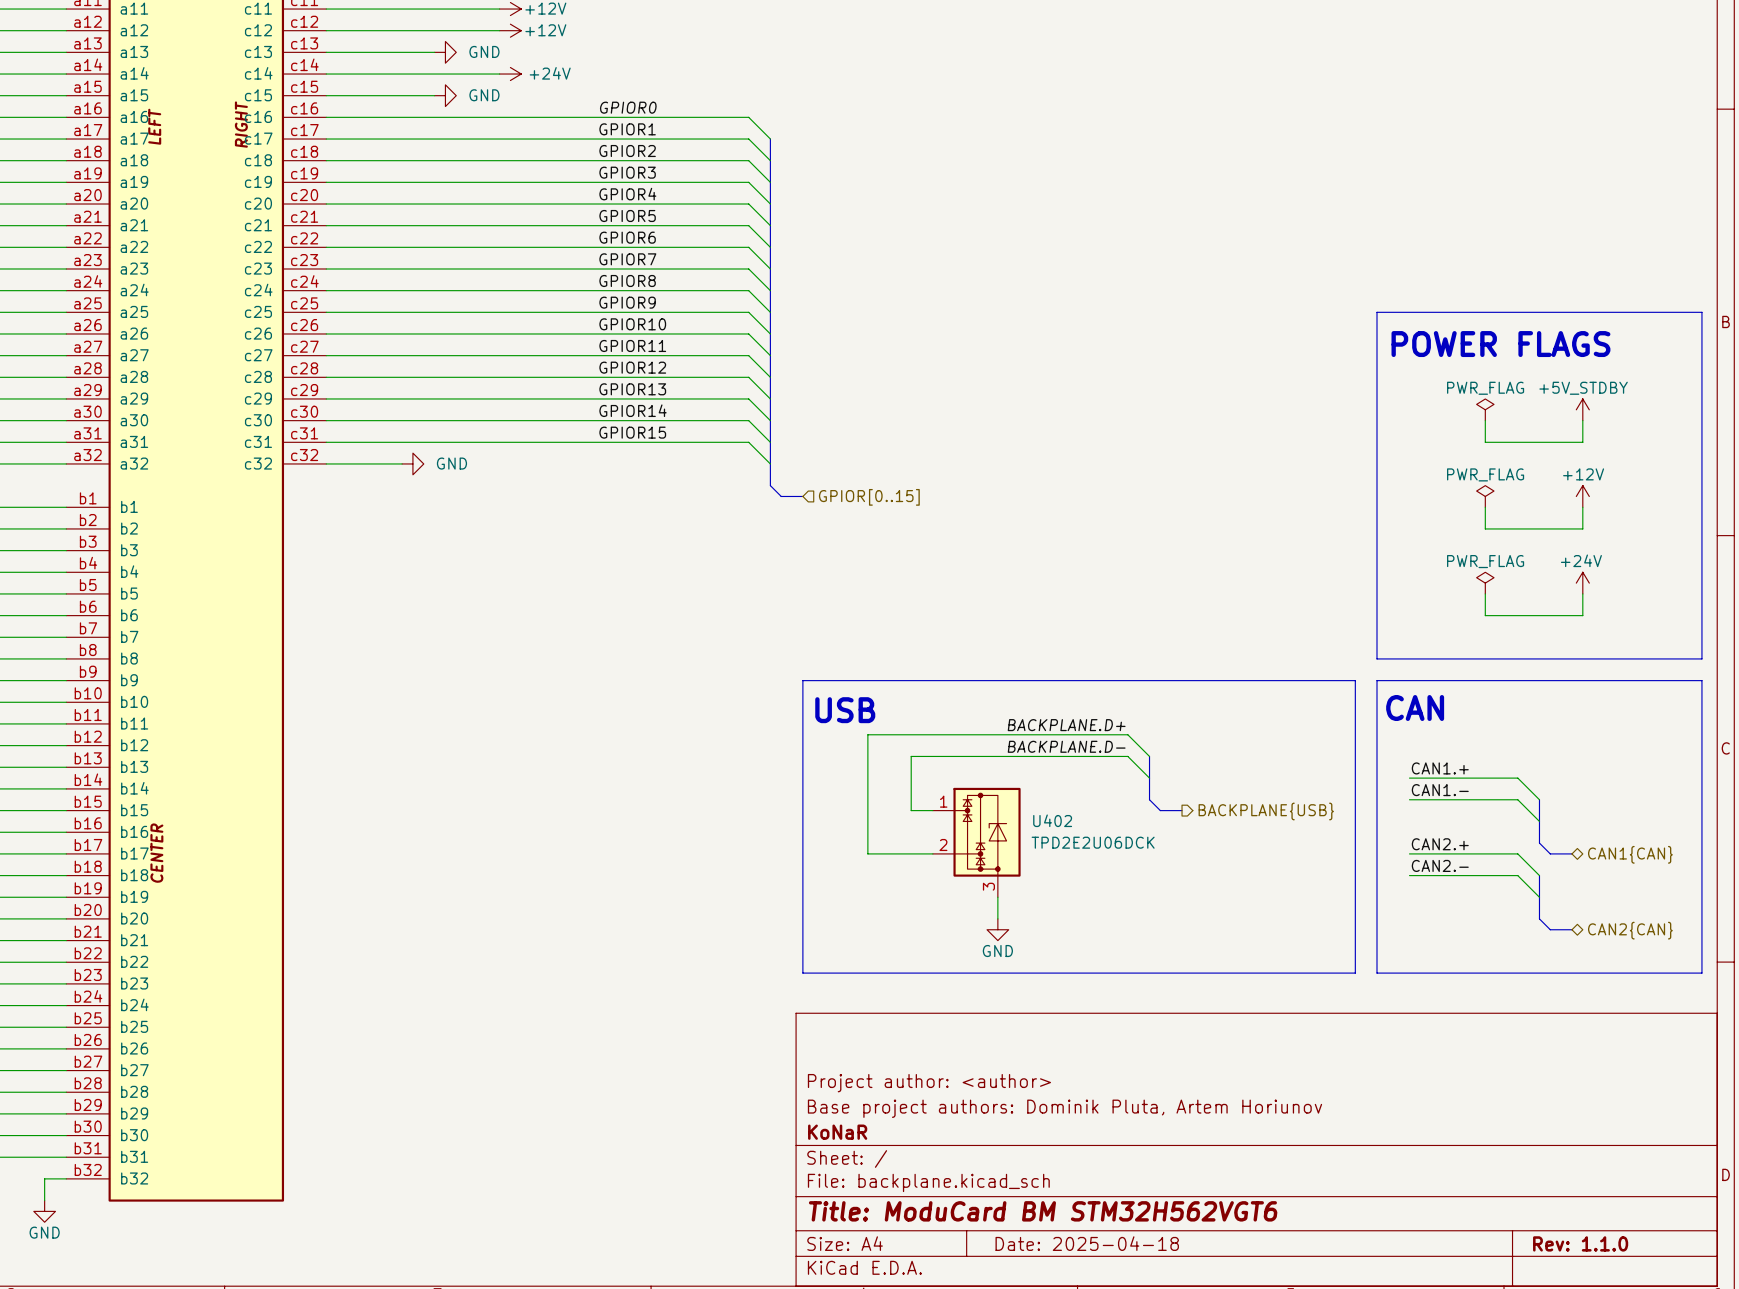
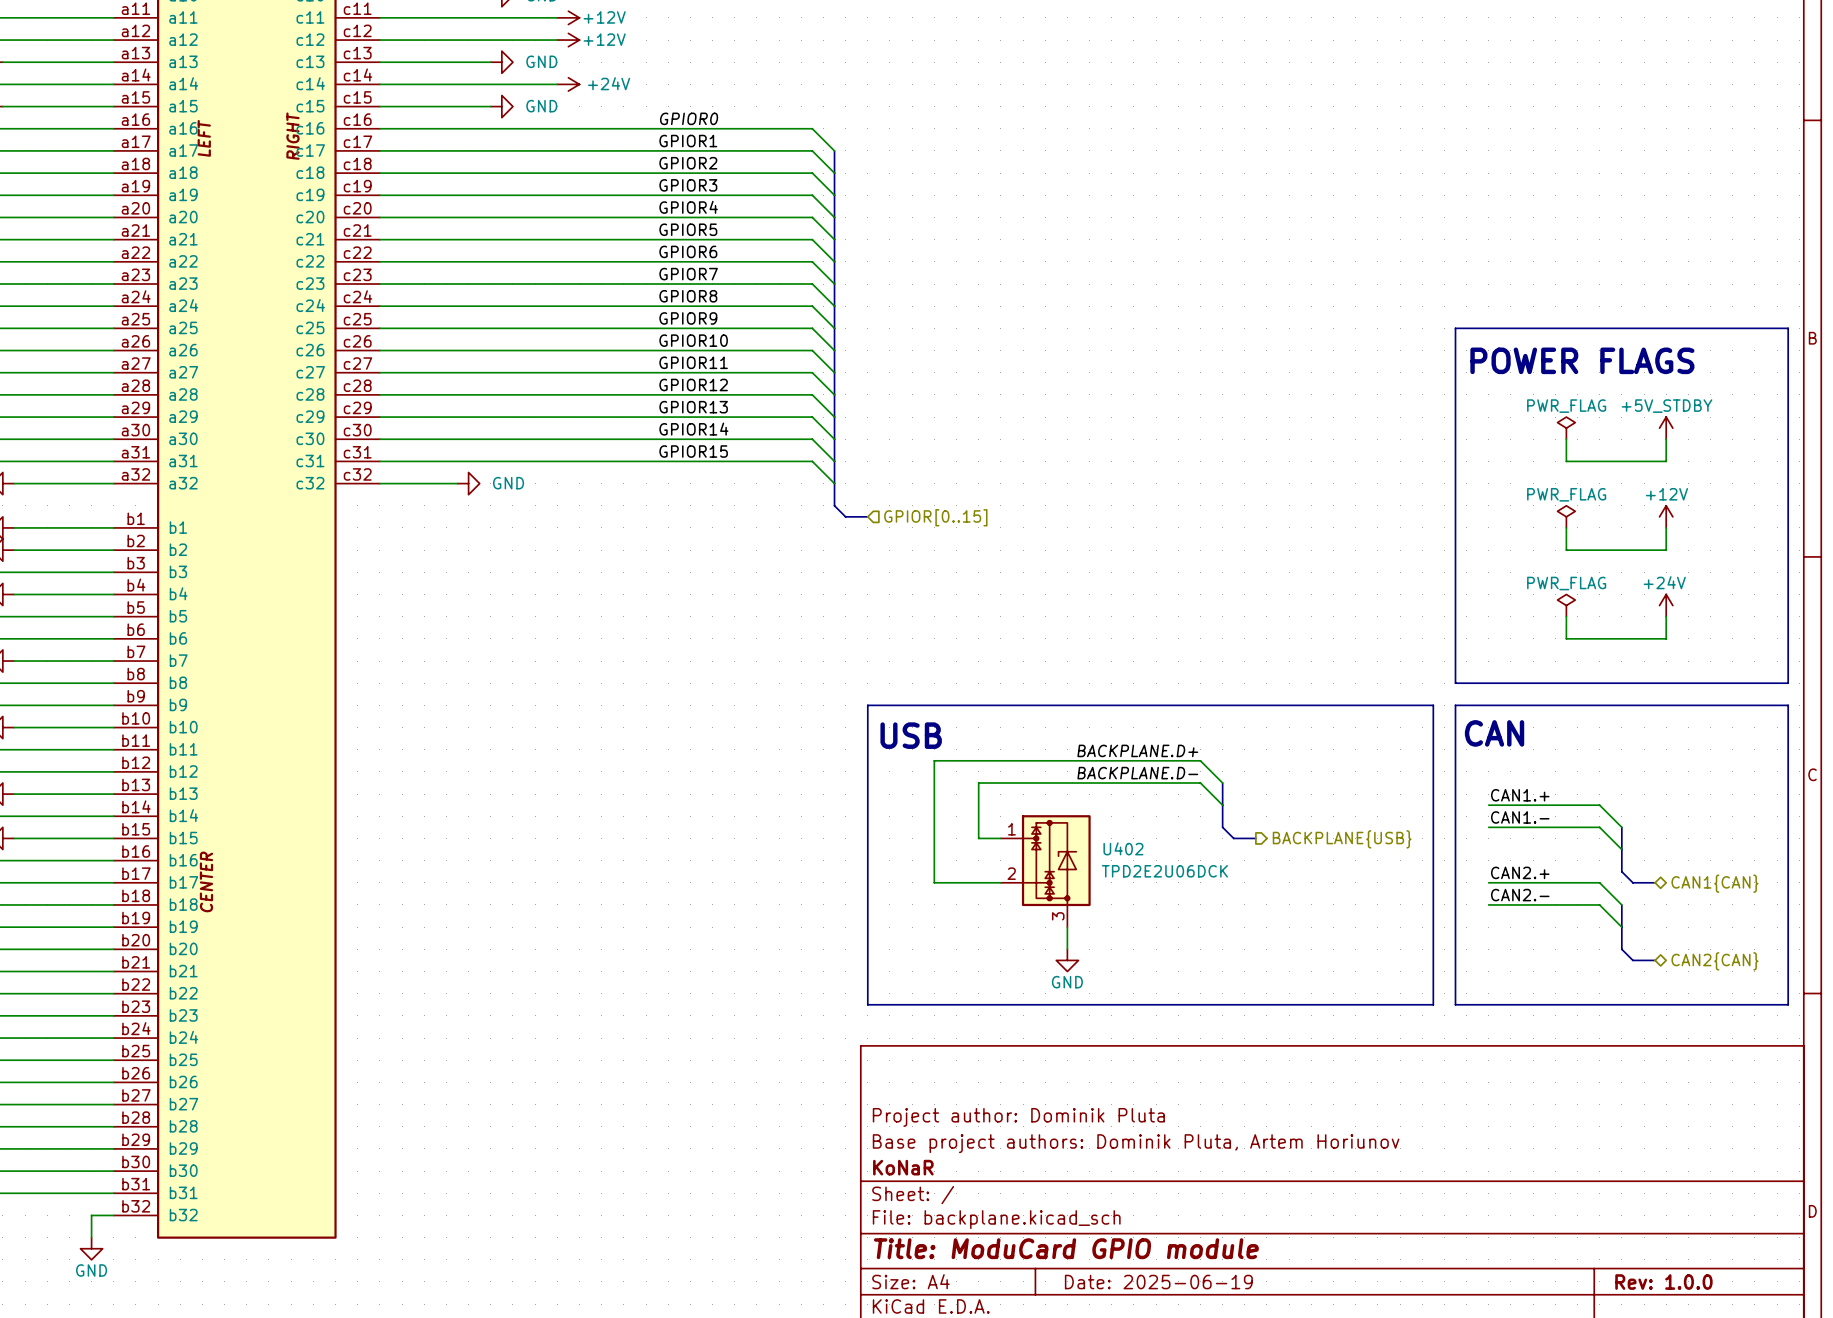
title block: Project author: <author> (929, 1083) -> Project author: Dominik Pluta (1018, 1117)
title block: Title: ModuCard BM STM32H562VGT6 (1043, 1211) -> Title: ModuCard GPIO module (1066, 1248)
title block: Date: 2025-04-18 (1087, 1243) -> Date: 2025-06-19 (1158, 1282)
title block: Rev: 1.1.0 (1580, 1243) -> Rev: 1.0.0 (1663, 1282)

